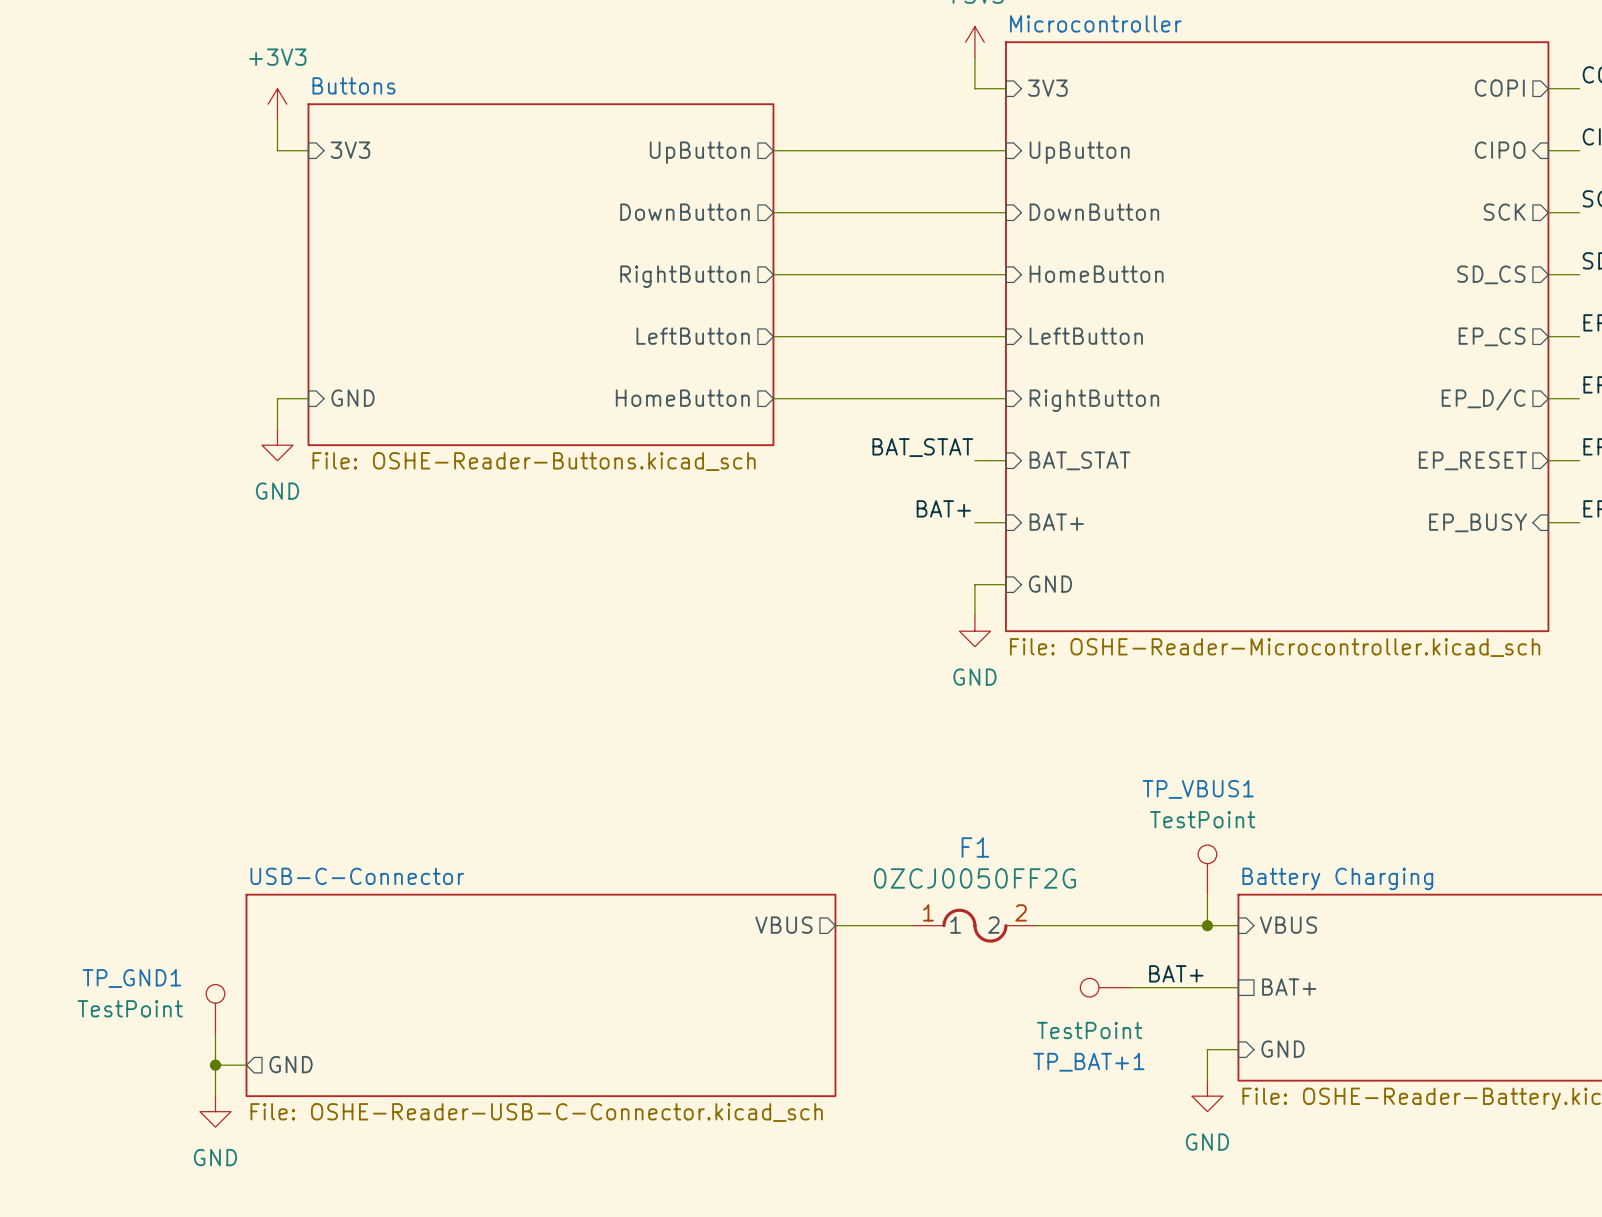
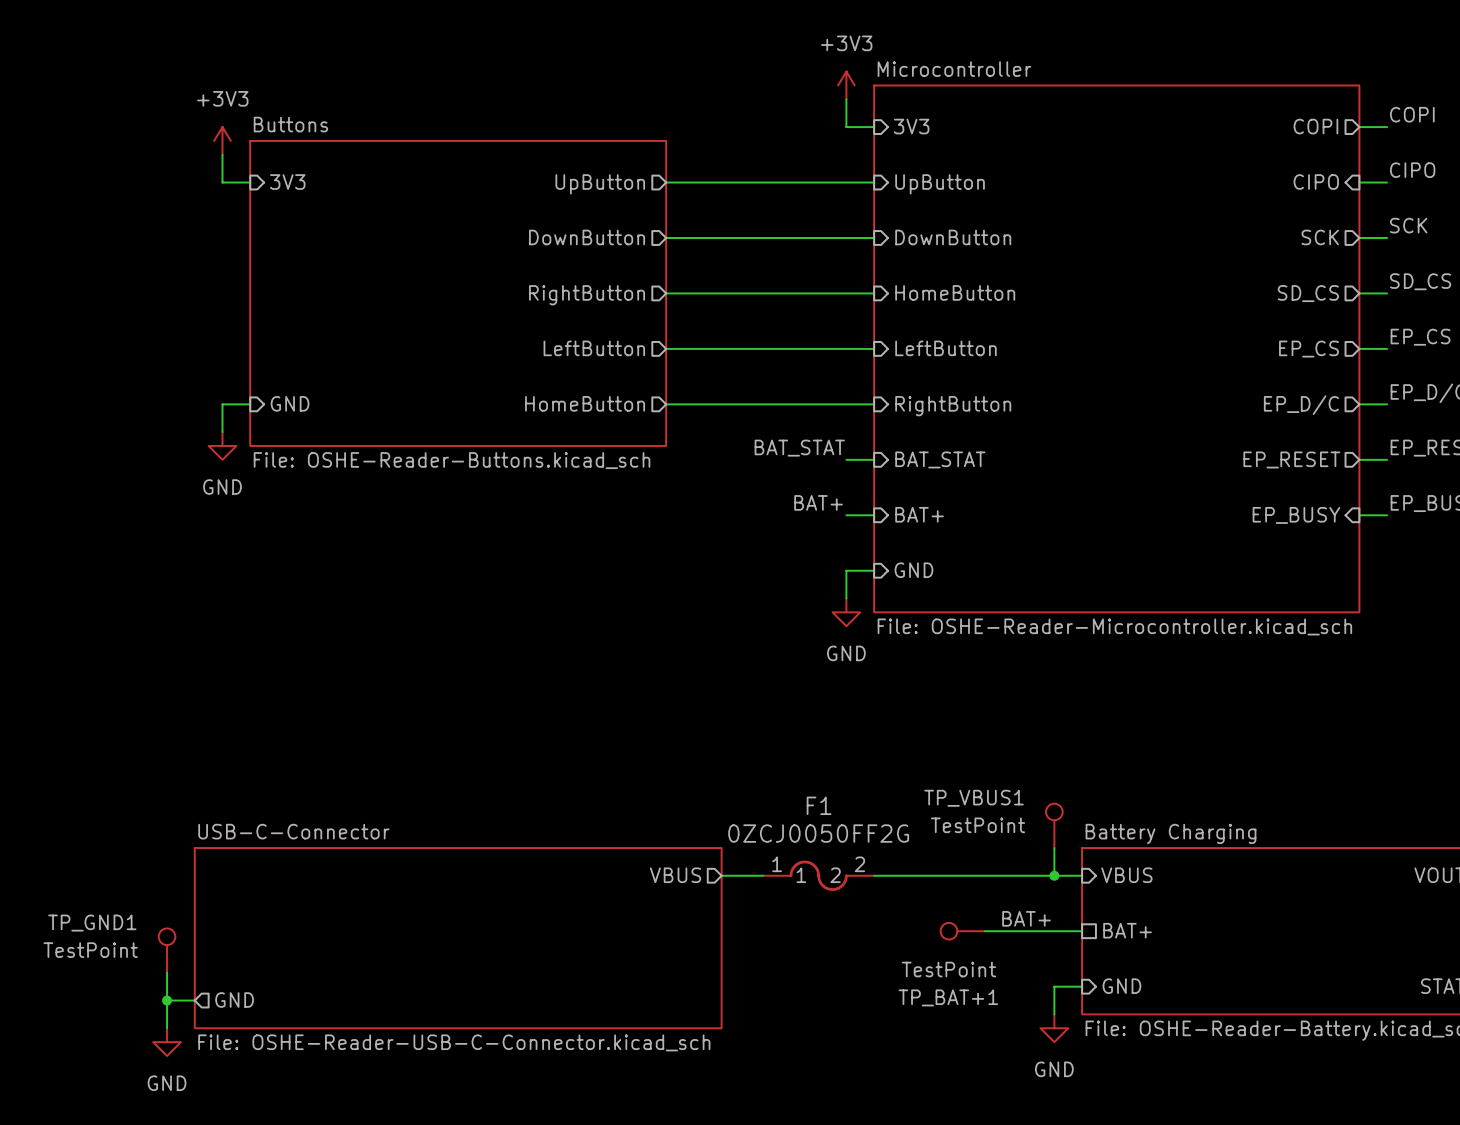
TP_VBUS1 name position: TP_VBUS1 (1198, 789) -> TP_VBUS1 (974, 798)
TP_VBUS1 value position: TestPoint (1202, 819) -> TestPoint (978, 825)
F1 position: (974, 925) -> (818, 875)

